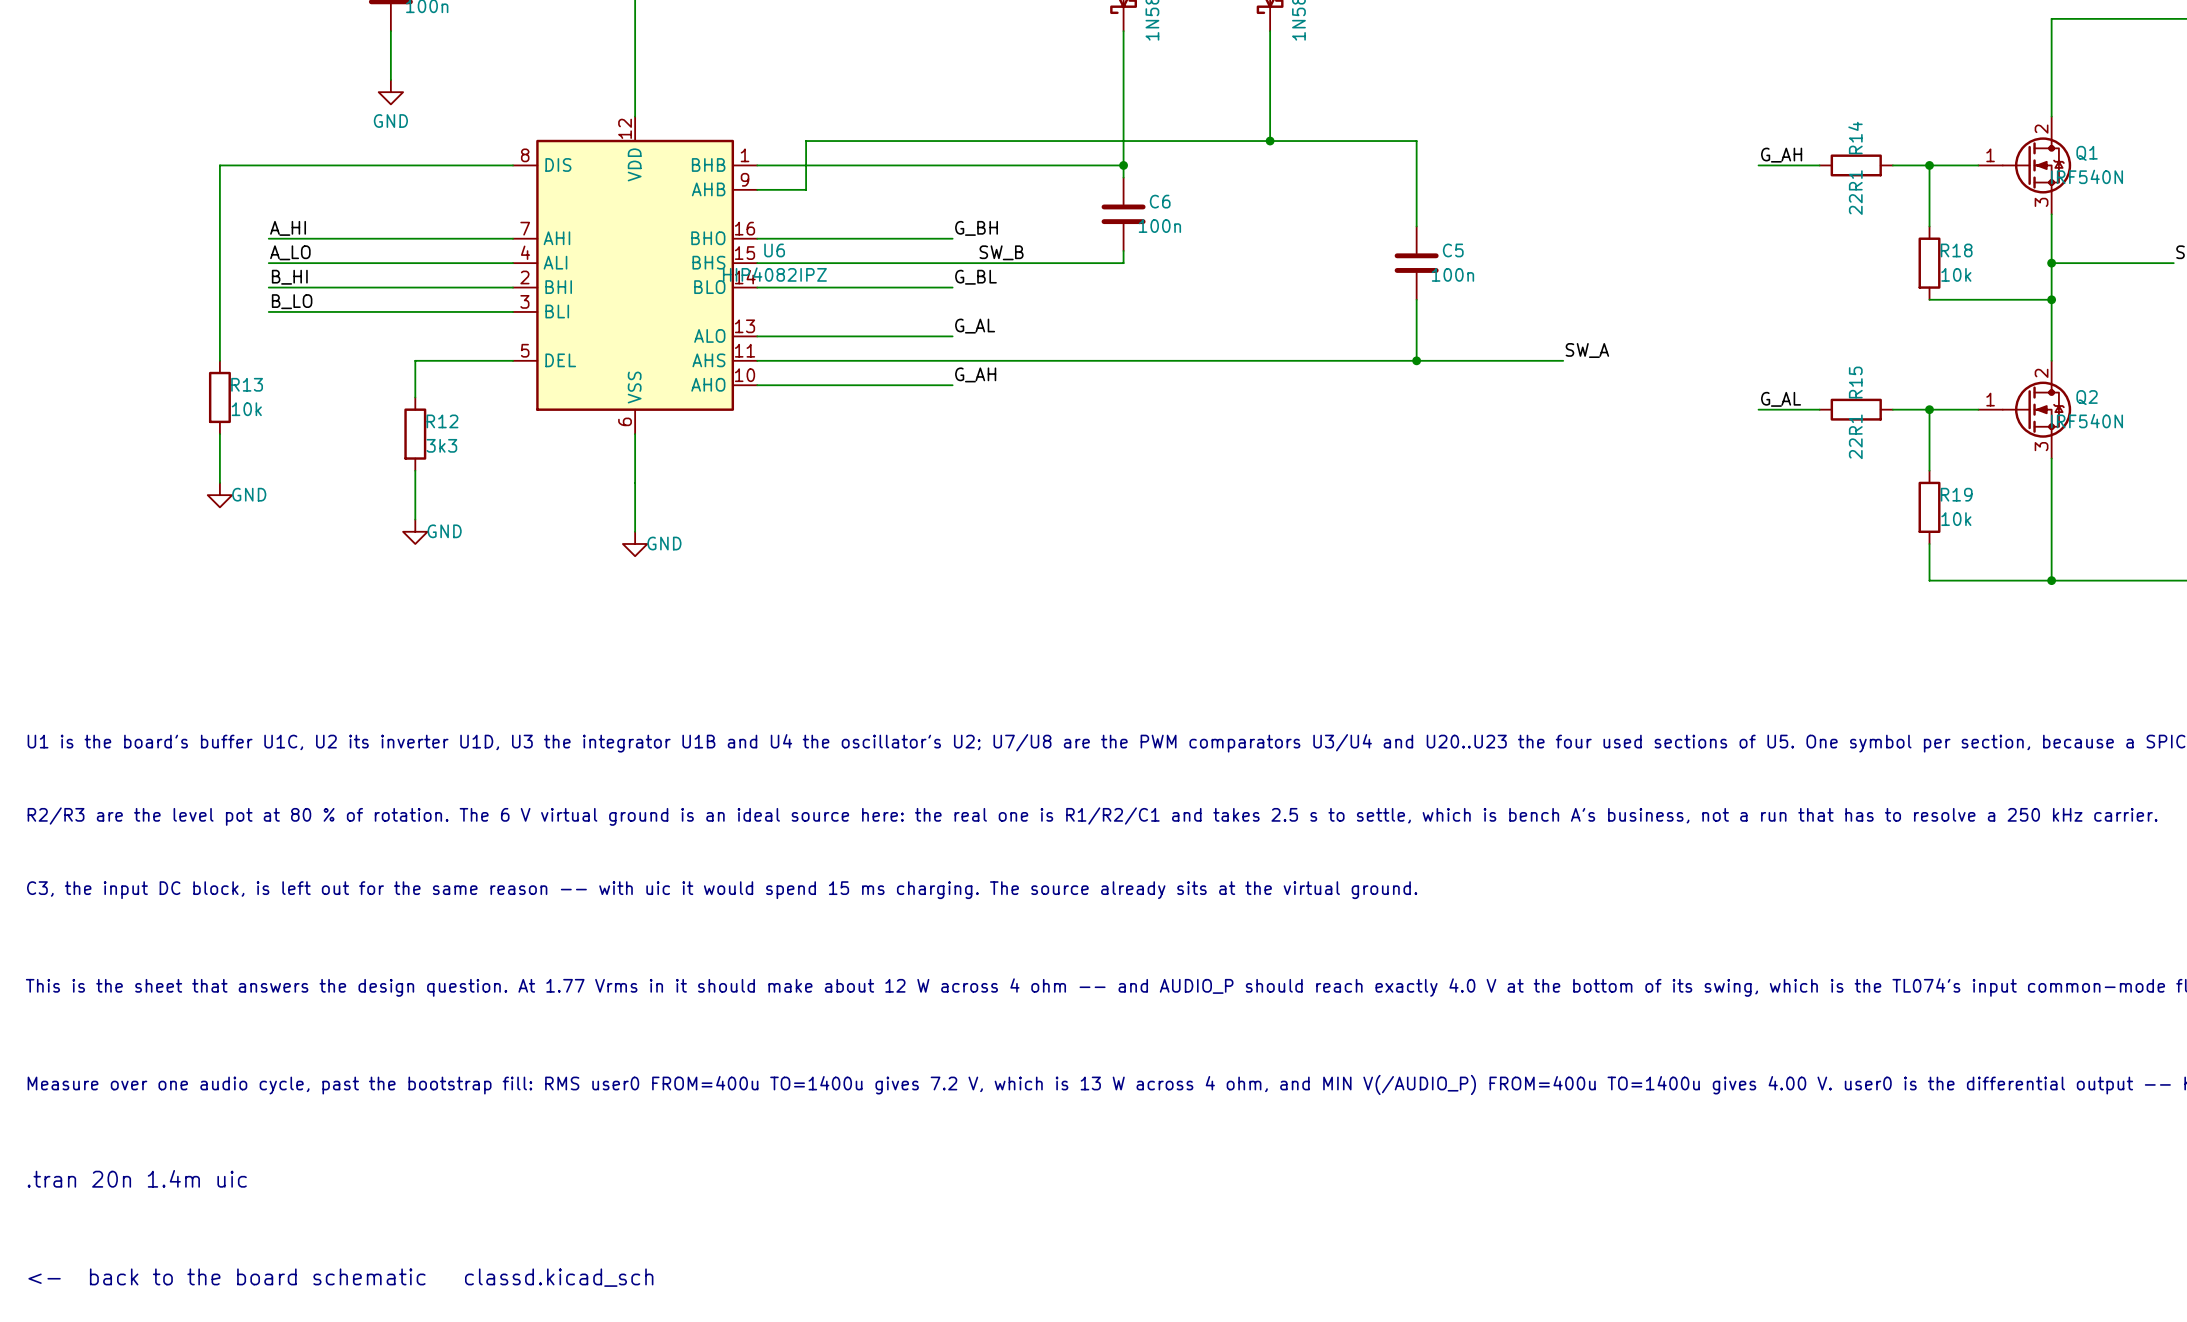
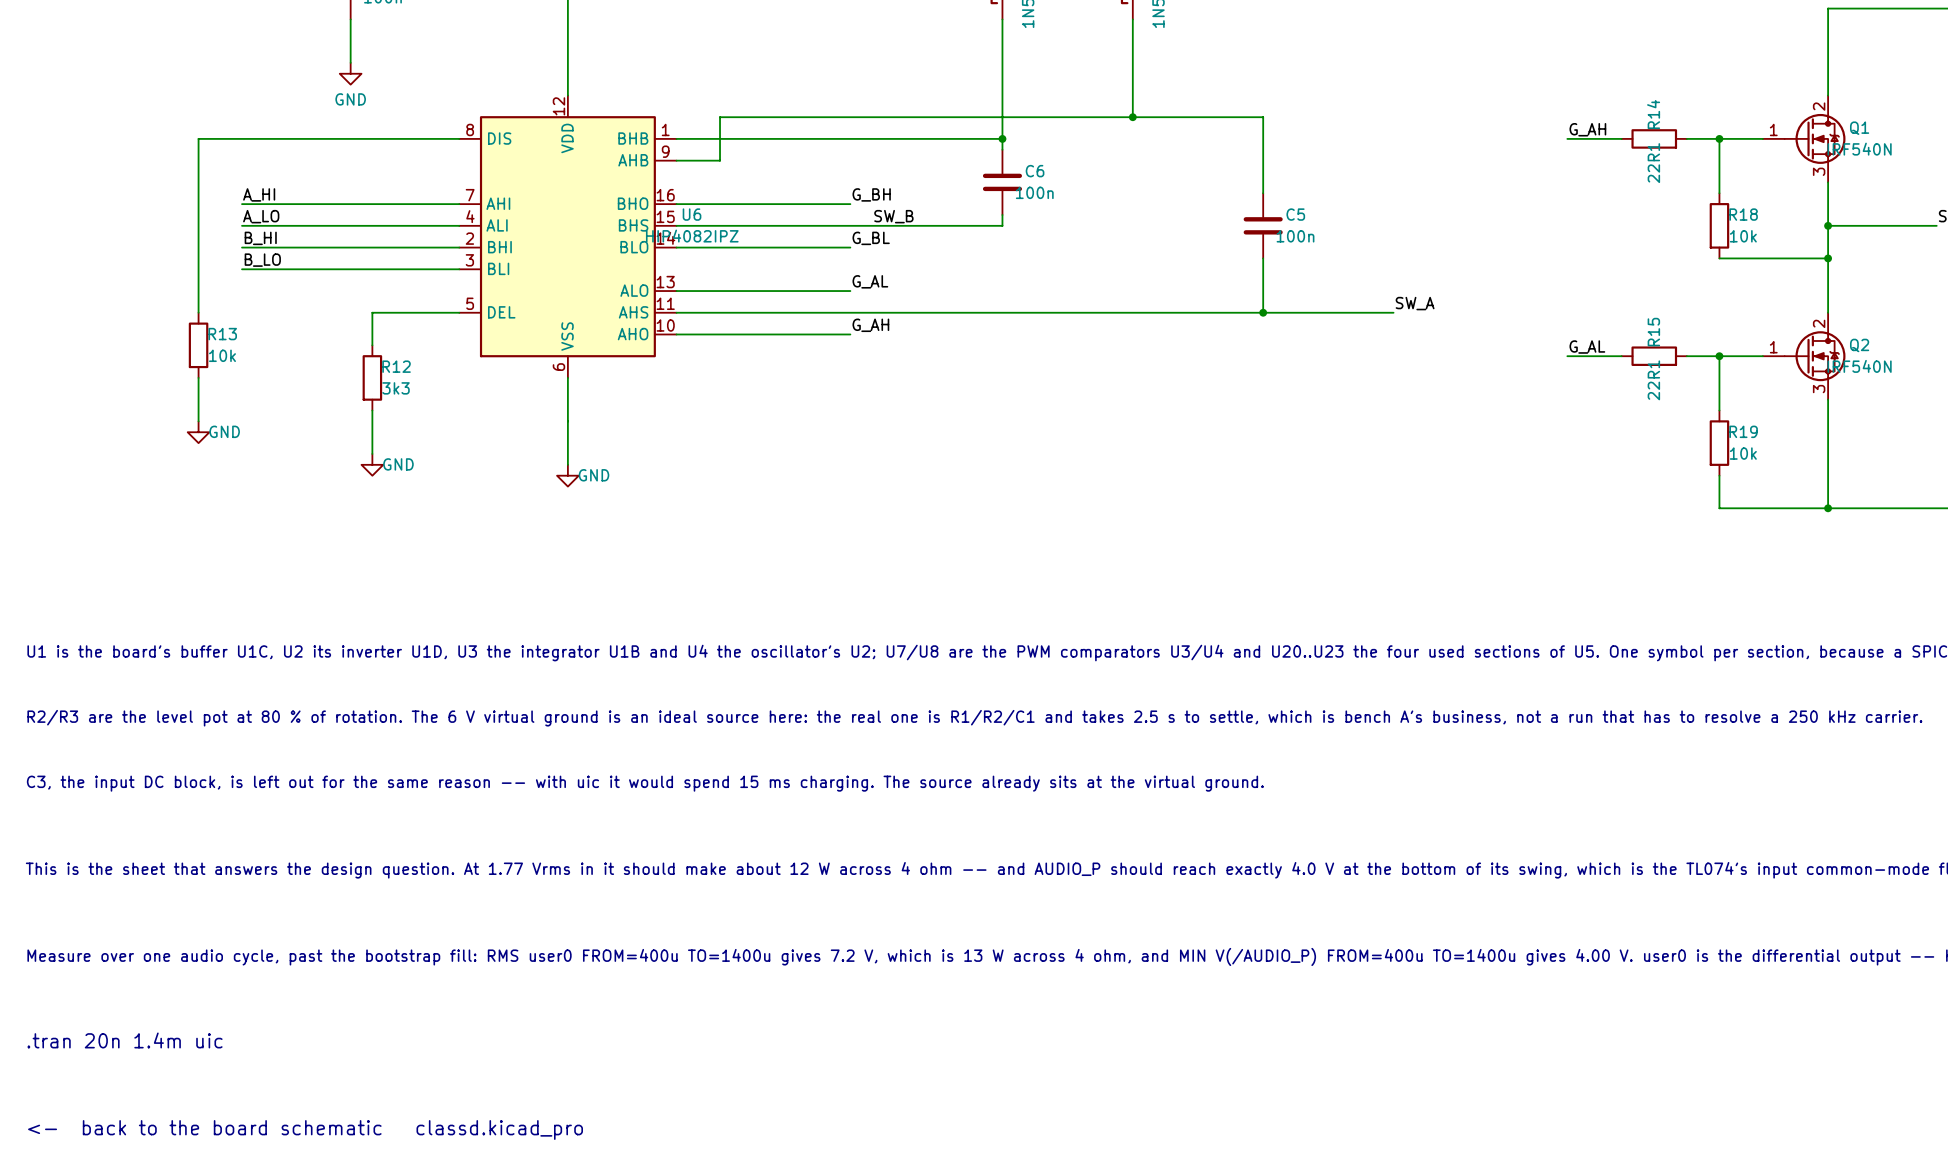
text: <- back to the board schematic classd.kicad_sch (340, 1277) -> <- back to the board schematic classd.kicad_pro (305, 1130)

